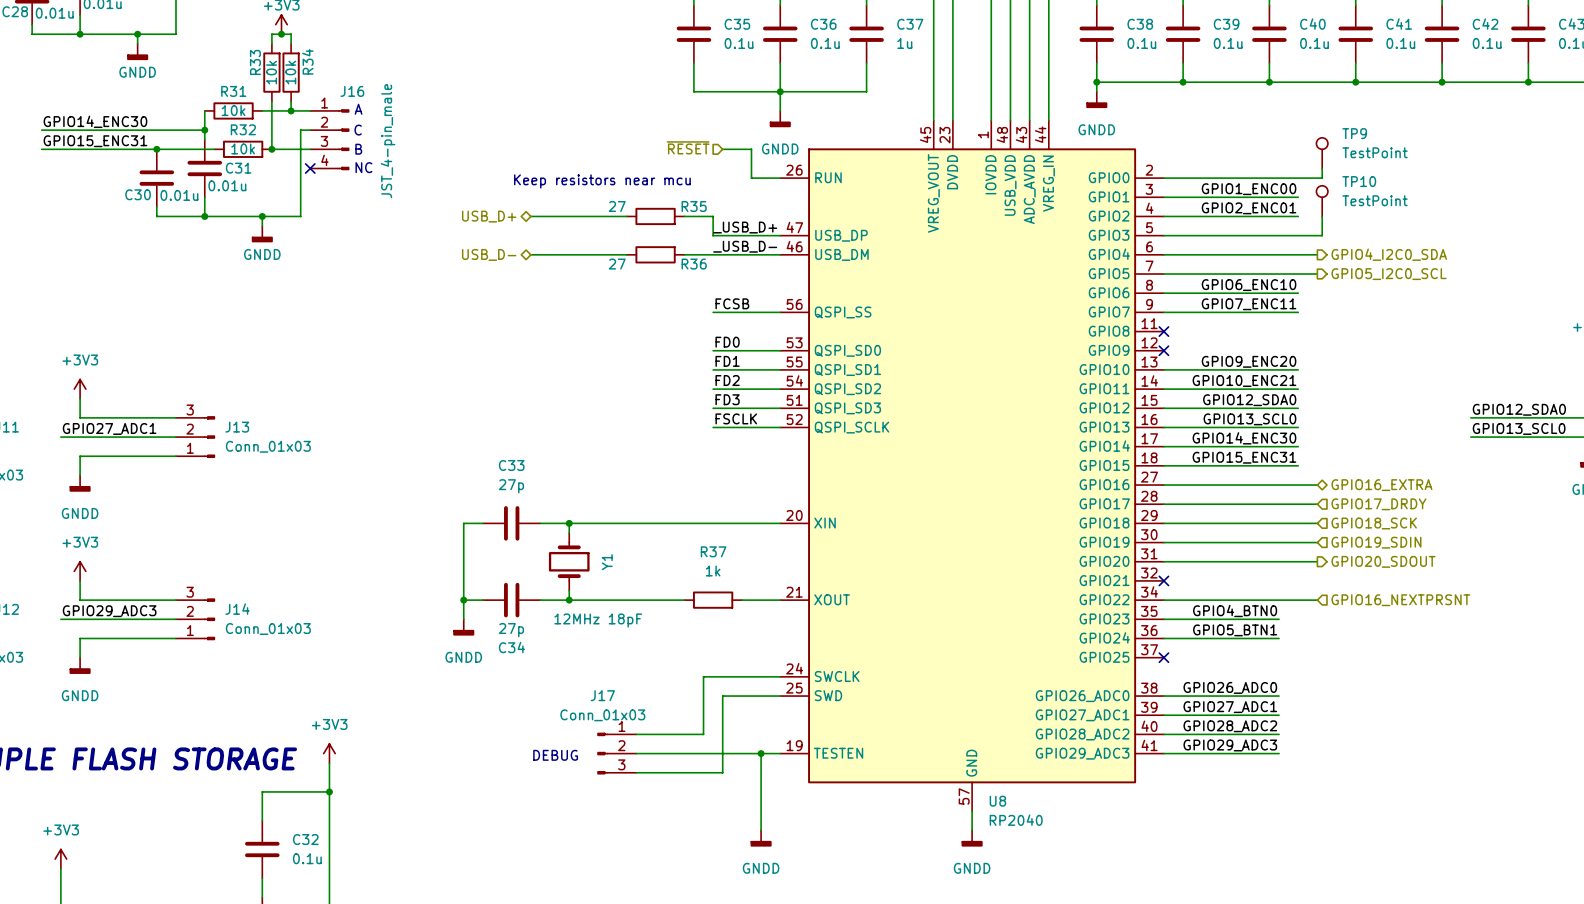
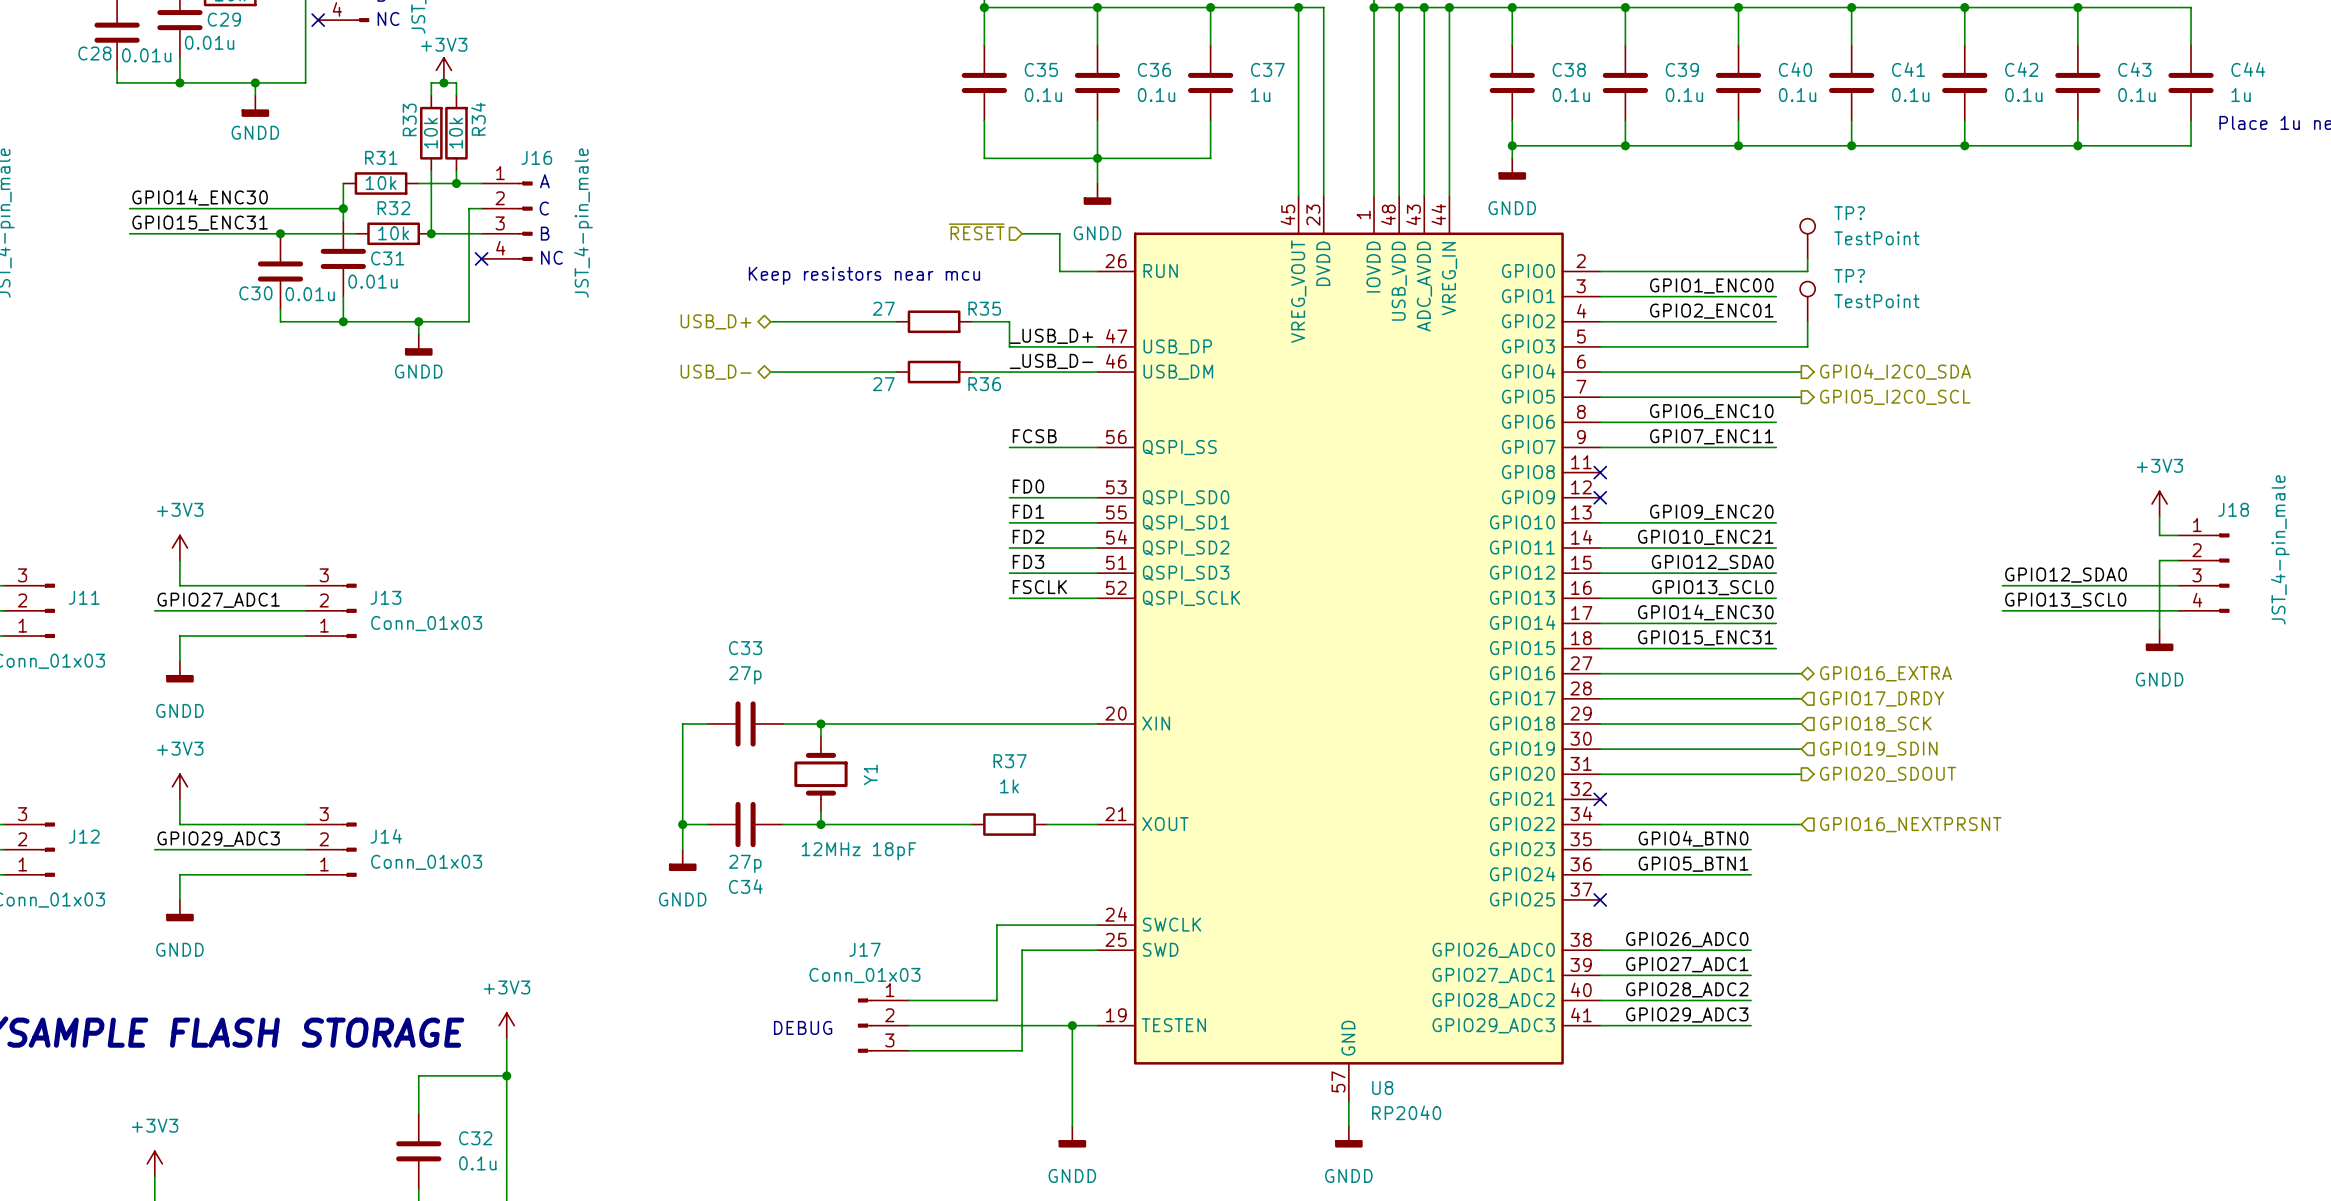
TP9 name: TP9 (1354, 133) -> TP? (1849, 213)
TP10 name: TP10 (1359, 181) -> TP? (1849, 276)

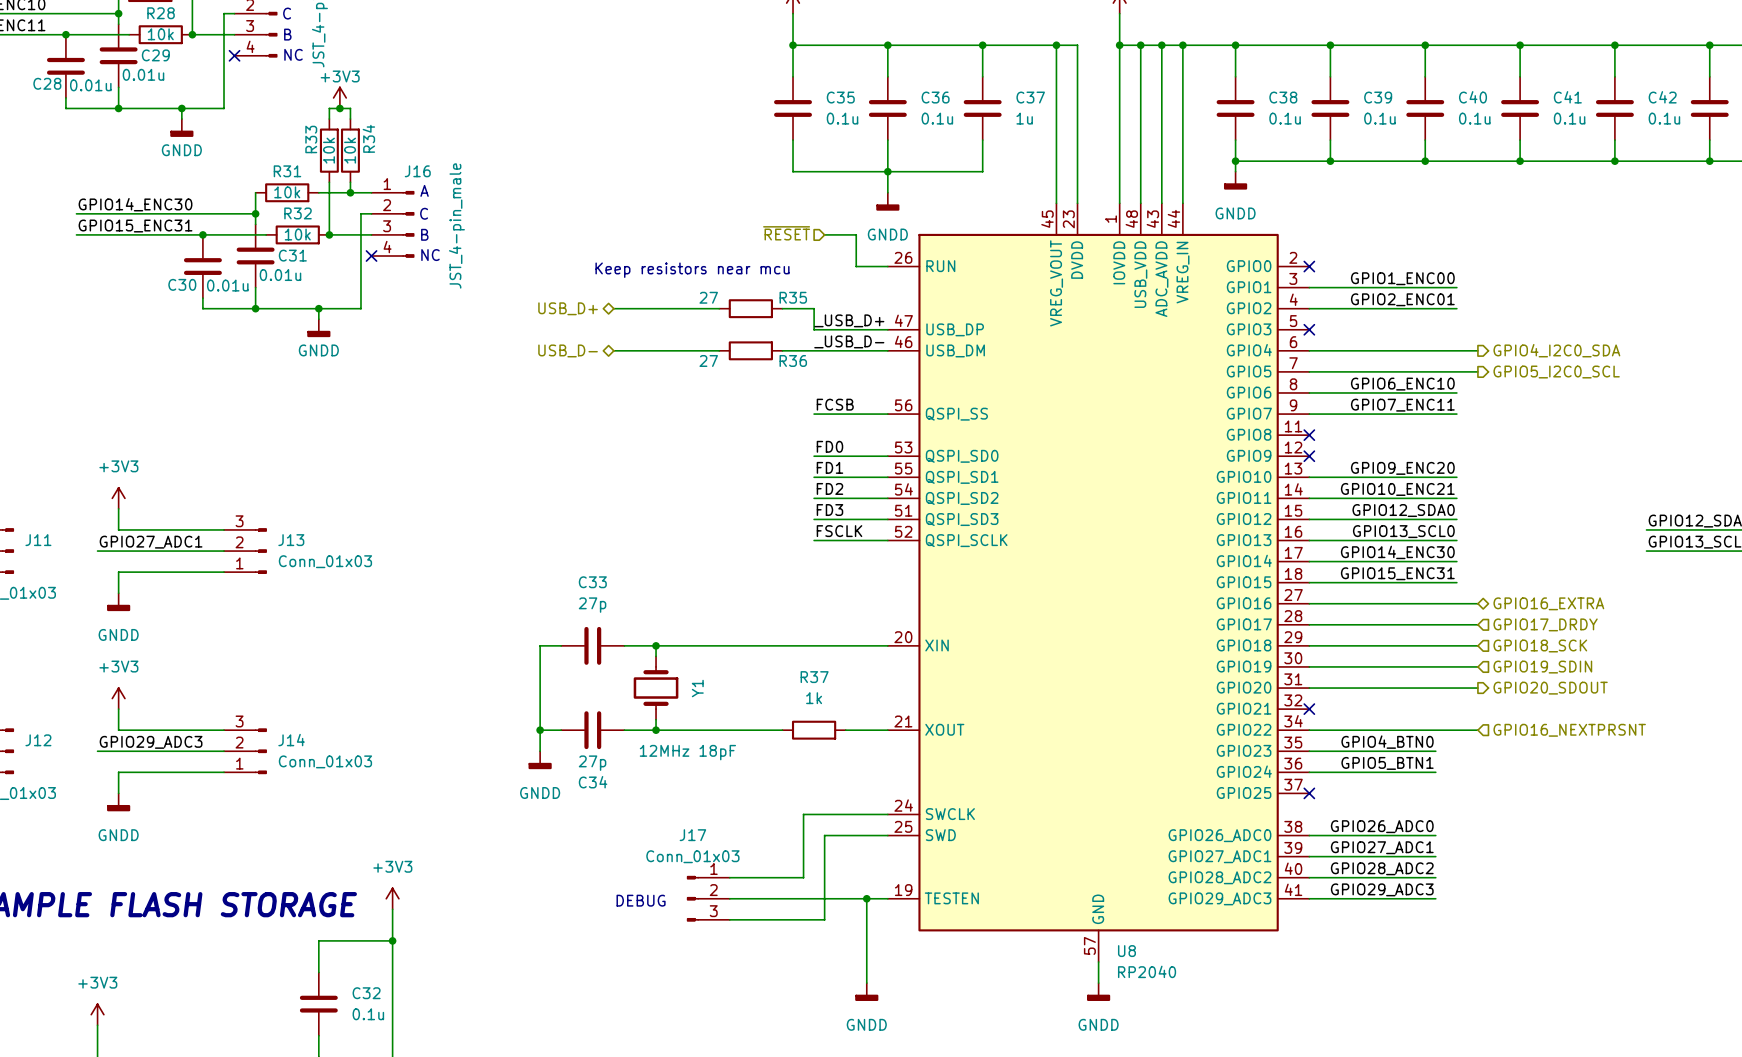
TP?: TestPoint (1807, 238) -> none
wire: (1807, 258) (1807, 271) (1600, 271) -> none
no-connect mark: none -> (1309, 266)
TP?: TestPoint (1807, 301) -> none
wire: (1807, 321) (1807, 346) (1600, 346) -> none
no-connect mark: none -> (1309, 329)

